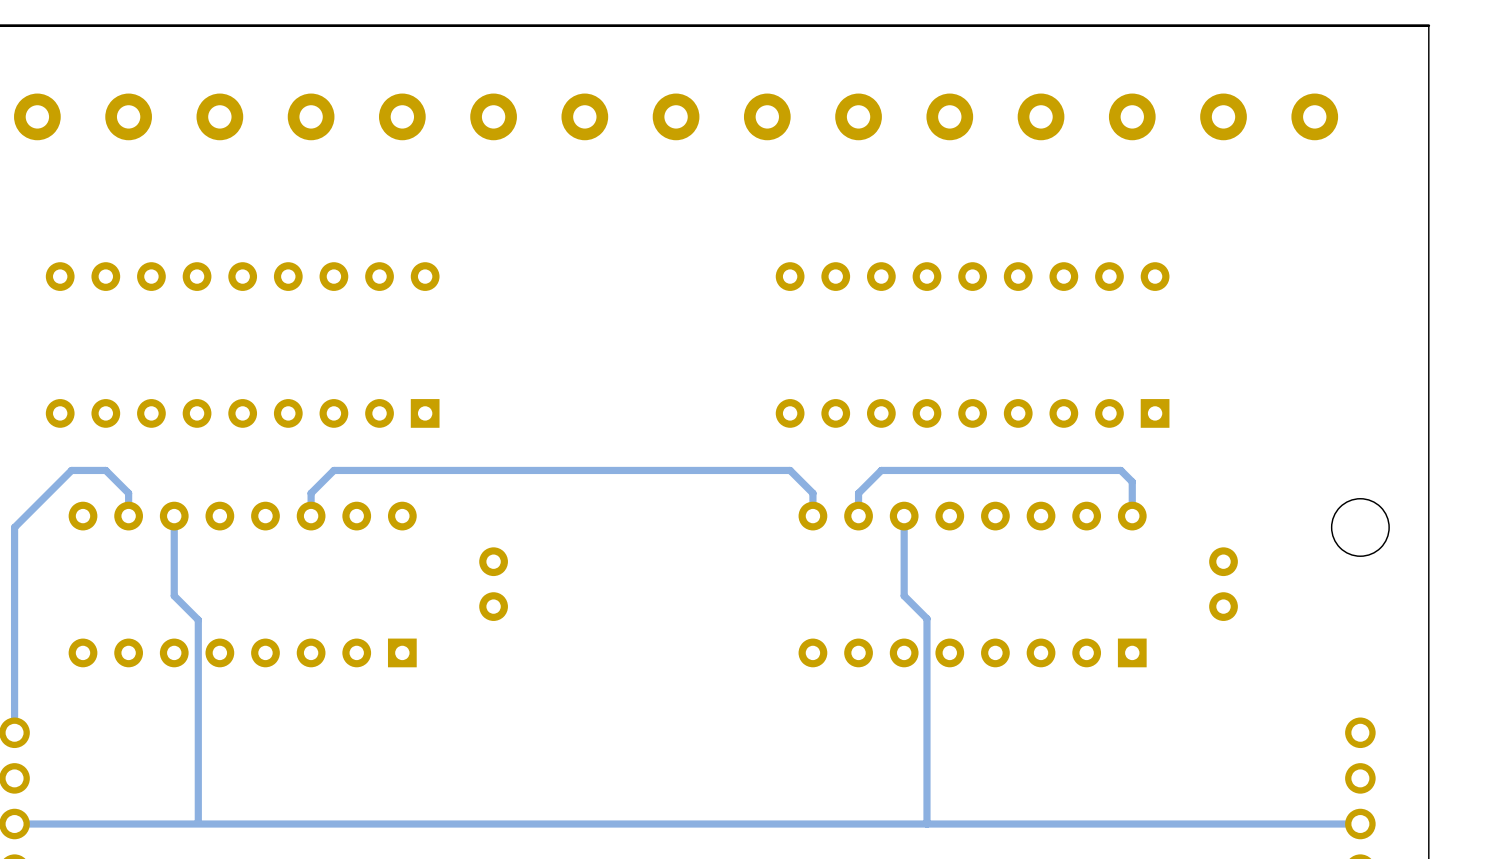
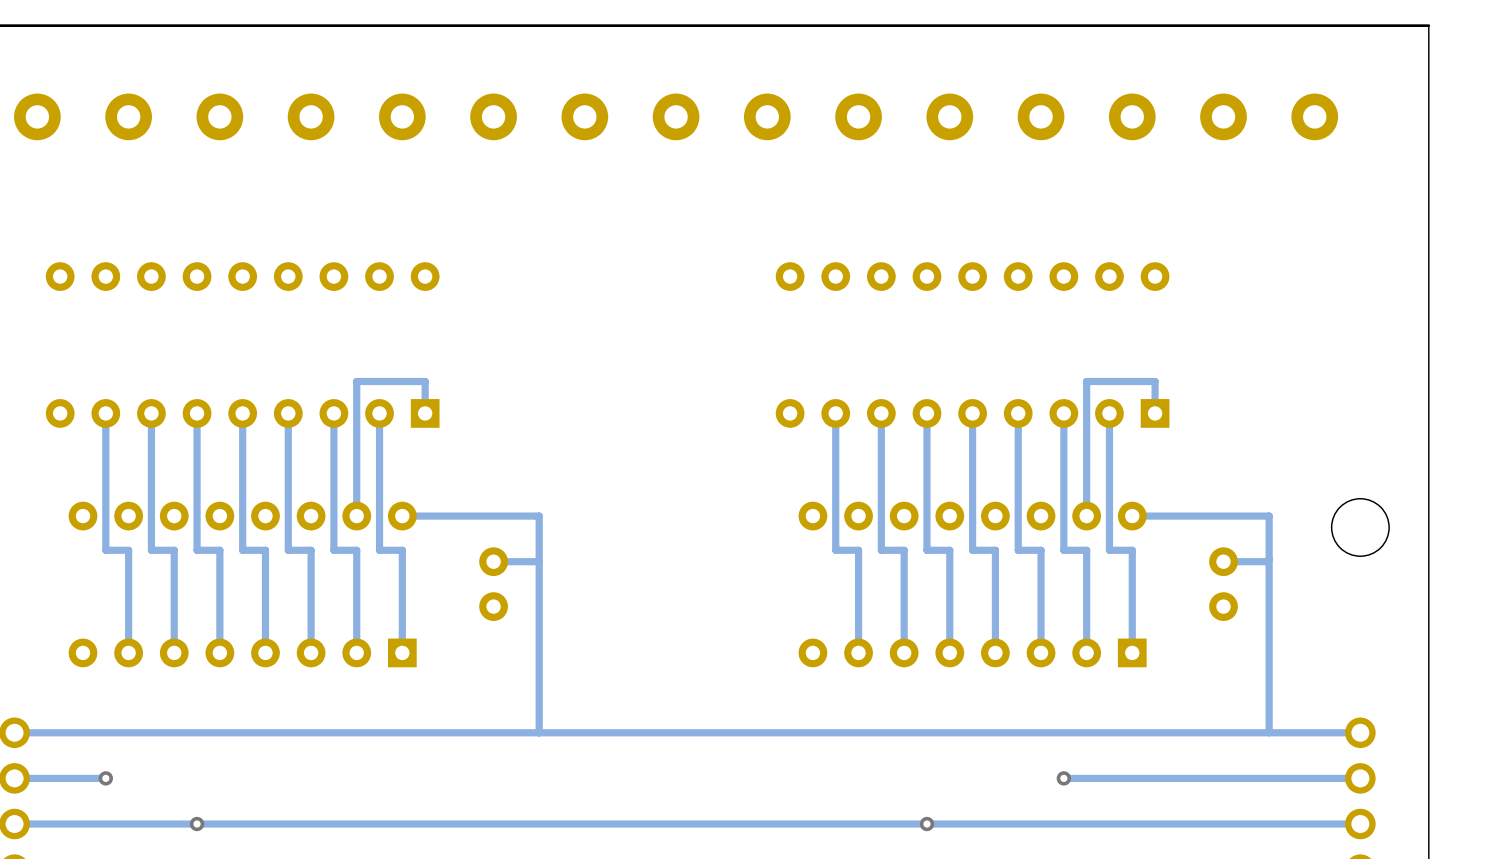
track: none -> (105, 413) (105, 550) (128, 550) (128, 652)
track: none -> (197, 413) (197, 550) (219, 550) (219, 652)
track: none -> (242, 413) (242, 550) (265, 550) (265, 652)
track: none -> (288, 413) (288, 550) (311, 550) (311, 652)
track: none -> (333, 413) (333, 550) (356, 550) (356, 652)
track: none -> (379, 413) (379, 550) (402, 550) (402, 652)
track: none -> (425, 413) (425, 381) (356, 381) (356, 516)
track: none -> (835, 413) (835, 550) (858, 550) (858, 652)
track: none -> (926, 413) (926, 550) (949, 550) (949, 652)
track: none -> (972, 413) (972, 550) (995, 550) (995, 652)
track: none -> (1018, 413) (1018, 550) (1041, 550) (1041, 652)
track: none -> (1063, 413) (1063, 550) (1086, 550) (1086, 652)
track: none -> (1109, 413) (1109, 550) (1132, 550) (1132, 652)
track: none -> (1155, 413) (1155, 381) (1086, 381) (1086, 516)
track: (128, 516) (128, 493) (105, 470) (71, 470) (14, 527) (14, 732) -> (1360, 732) (14, 732)
track: (174, 516) (174, 550) -> (151, 413) (151, 550) (174, 550)
track: none -> (402, 516) (539, 516) (539, 732)
track: (812, 516) (812, 493) (790, 470) (333, 470) (311, 493) (311, 516) -> none
track: (904, 516) (904, 550) -> (881, 413) (881, 550) (904, 550)
track: (1132, 516) (1132, 481) (1120, 470) (881, 470) (858, 493) (858, 516) -> (1132, 516) (1269, 516) (1269, 732)
track: none -> (1269, 559) (1266, 561) (1223, 561)
track: none -> (539, 561) (493, 561)
track: (174, 595) (198, 619) (198, 822) -> (174, 595) (174, 652)
track: (904, 595) (926, 618) (926, 824) -> (904, 595) (904, 652)
track: none -> (105, 778) (14, 778)
via: none -> (105, 778)
via: none -> (1063, 778)
track: none -> (1360, 778) (1063, 778)
via: none -> (197, 824)
via: none -> (926, 824)

